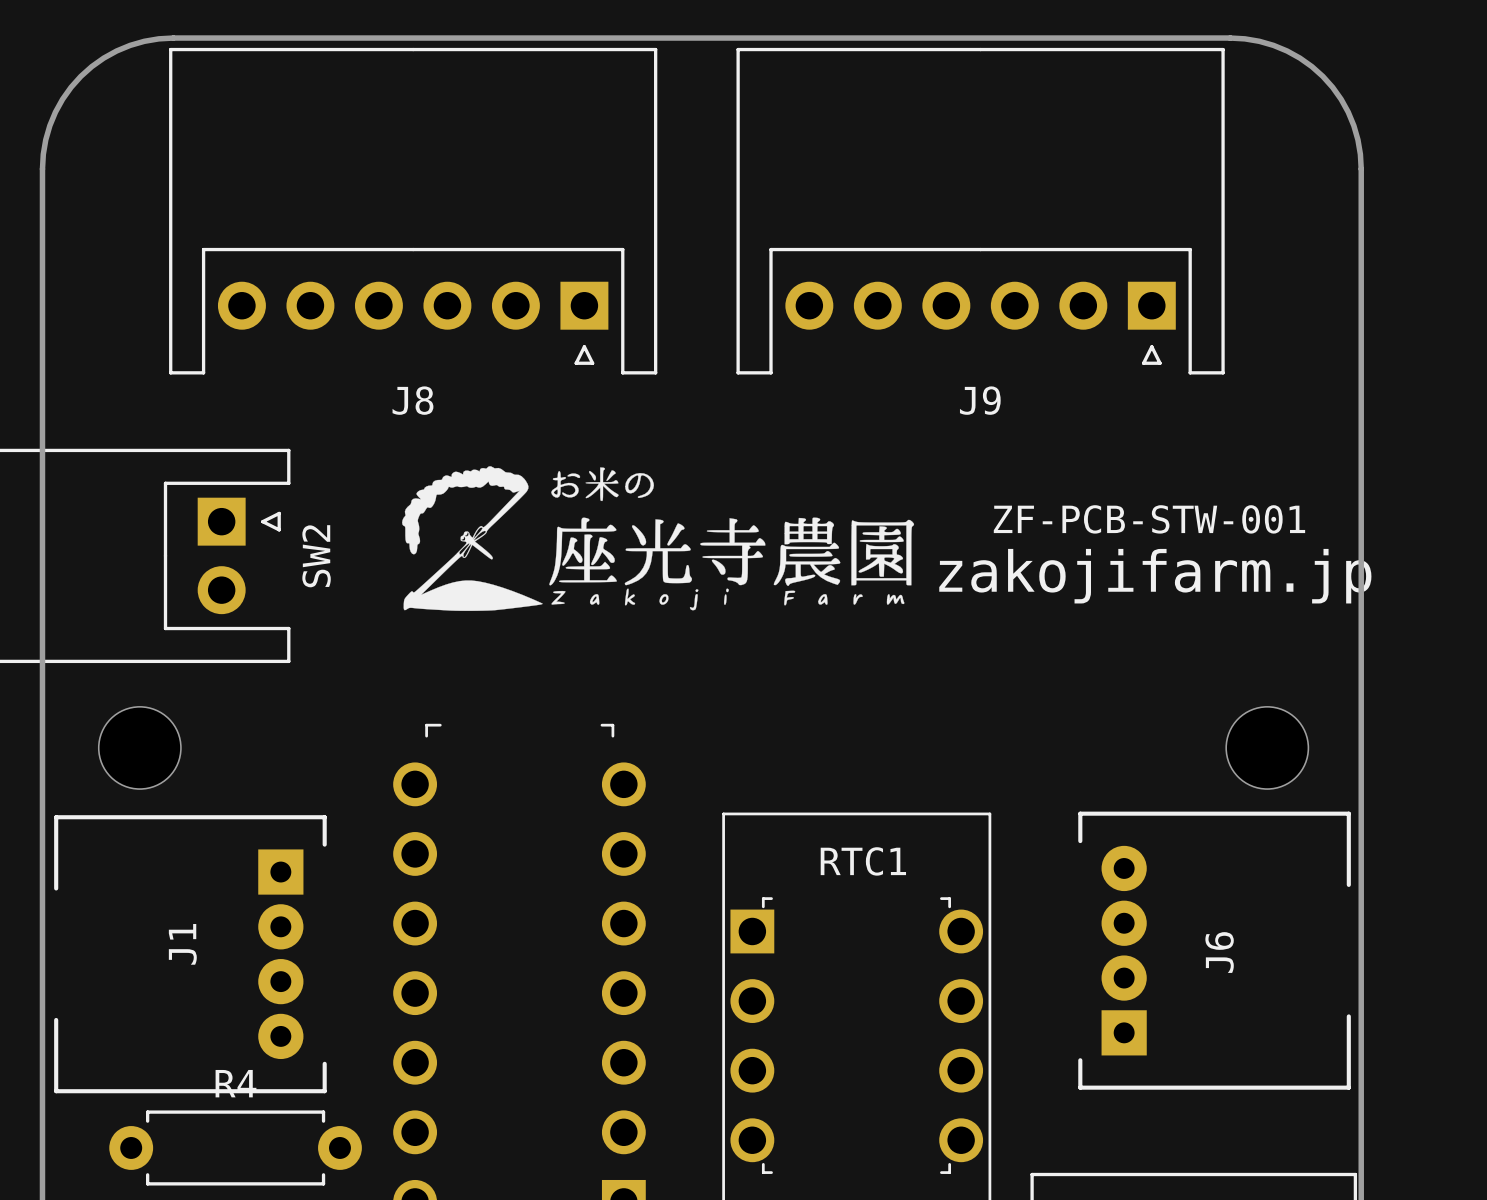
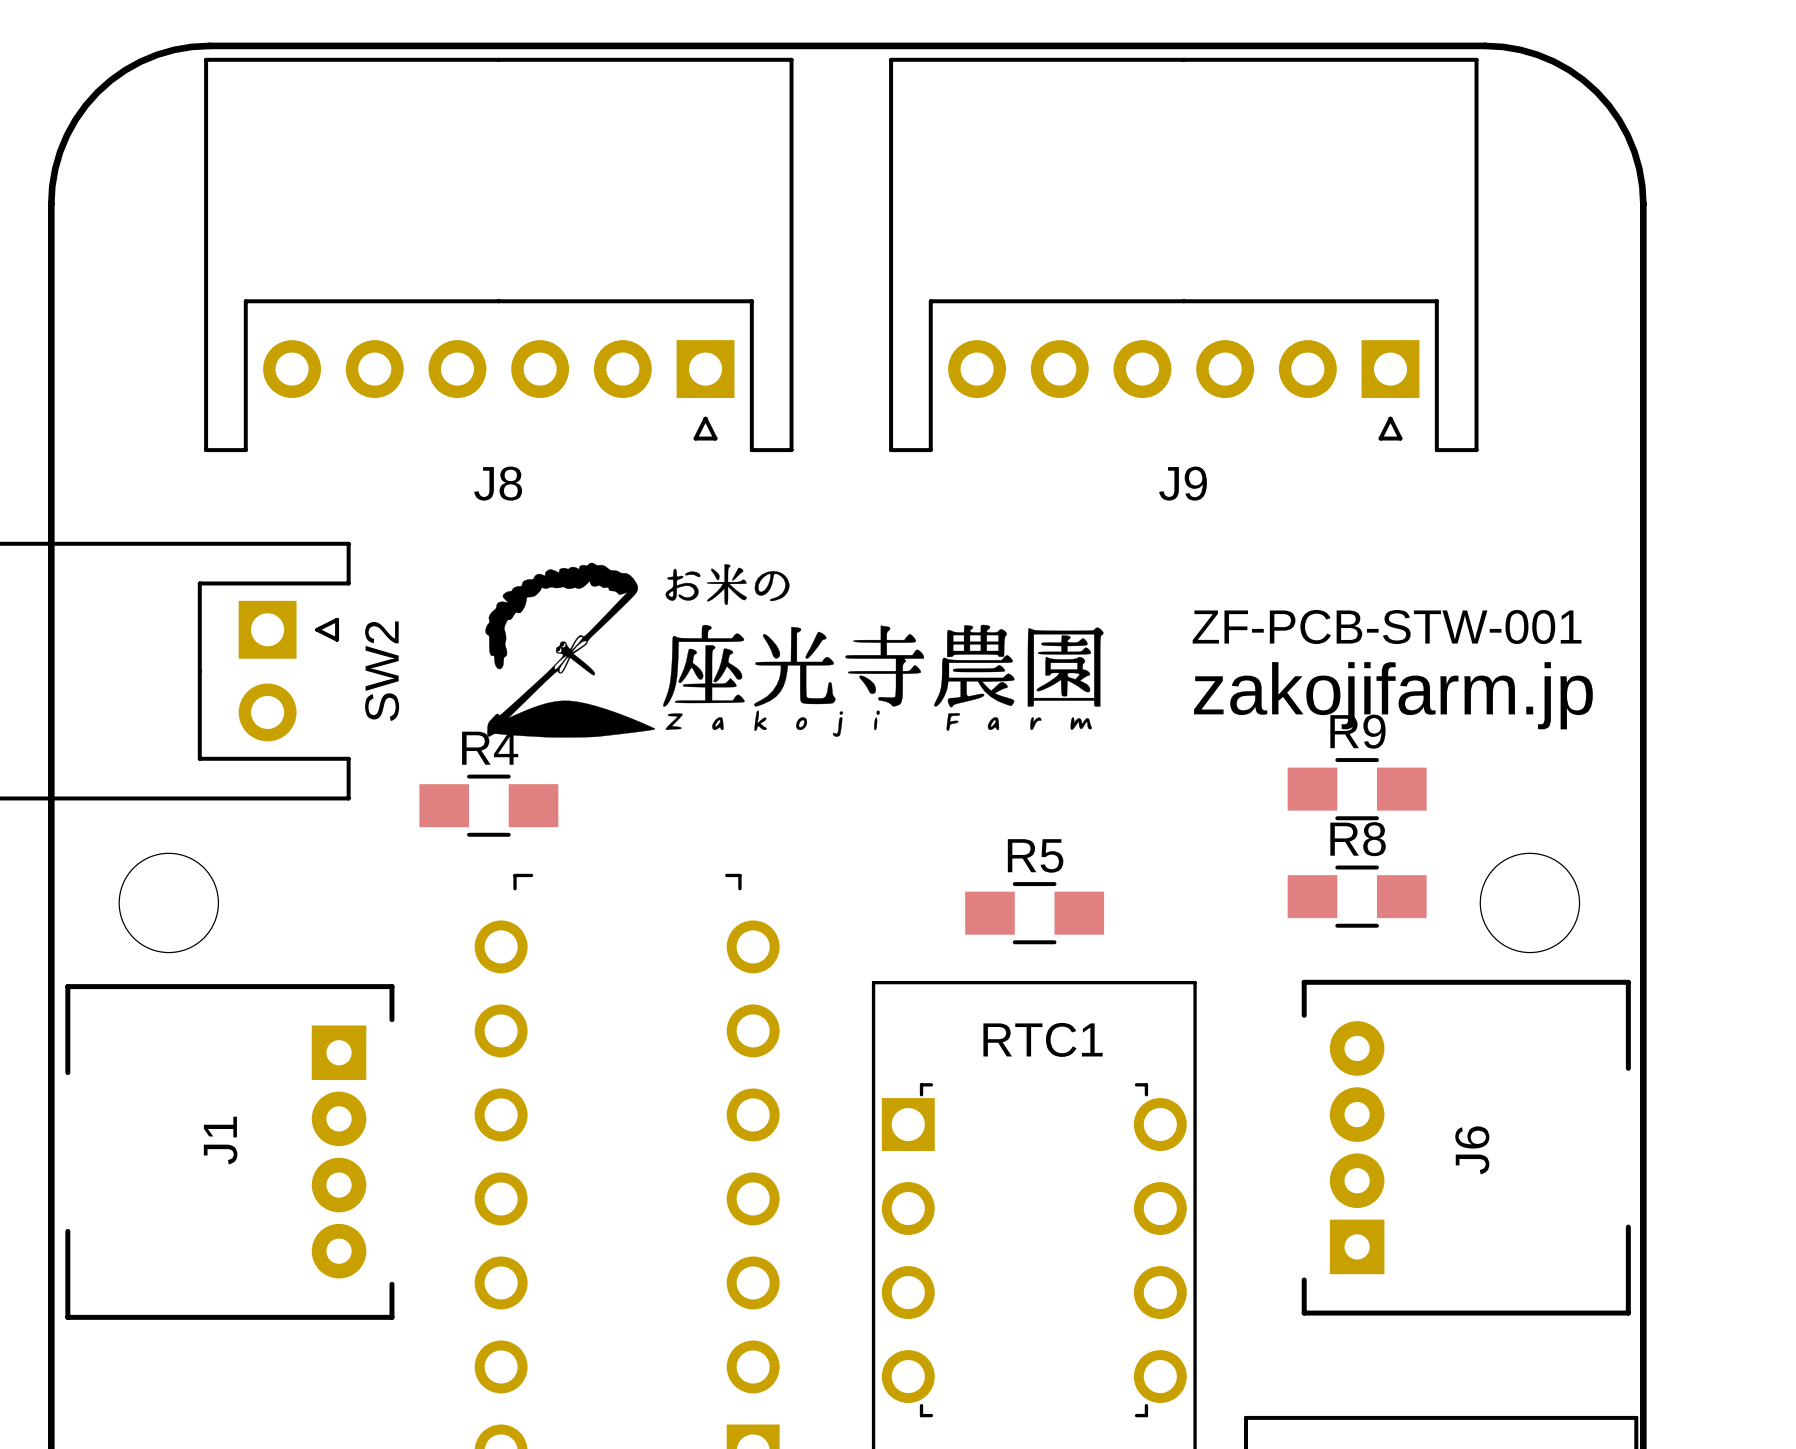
R9: none -> (1357, 789)
R8: none -> (1357, 896)
R5: none -> (1034, 913)
R4 footprint: [109, 1110, 362, 1186] -> [419, 774, 559, 837]

